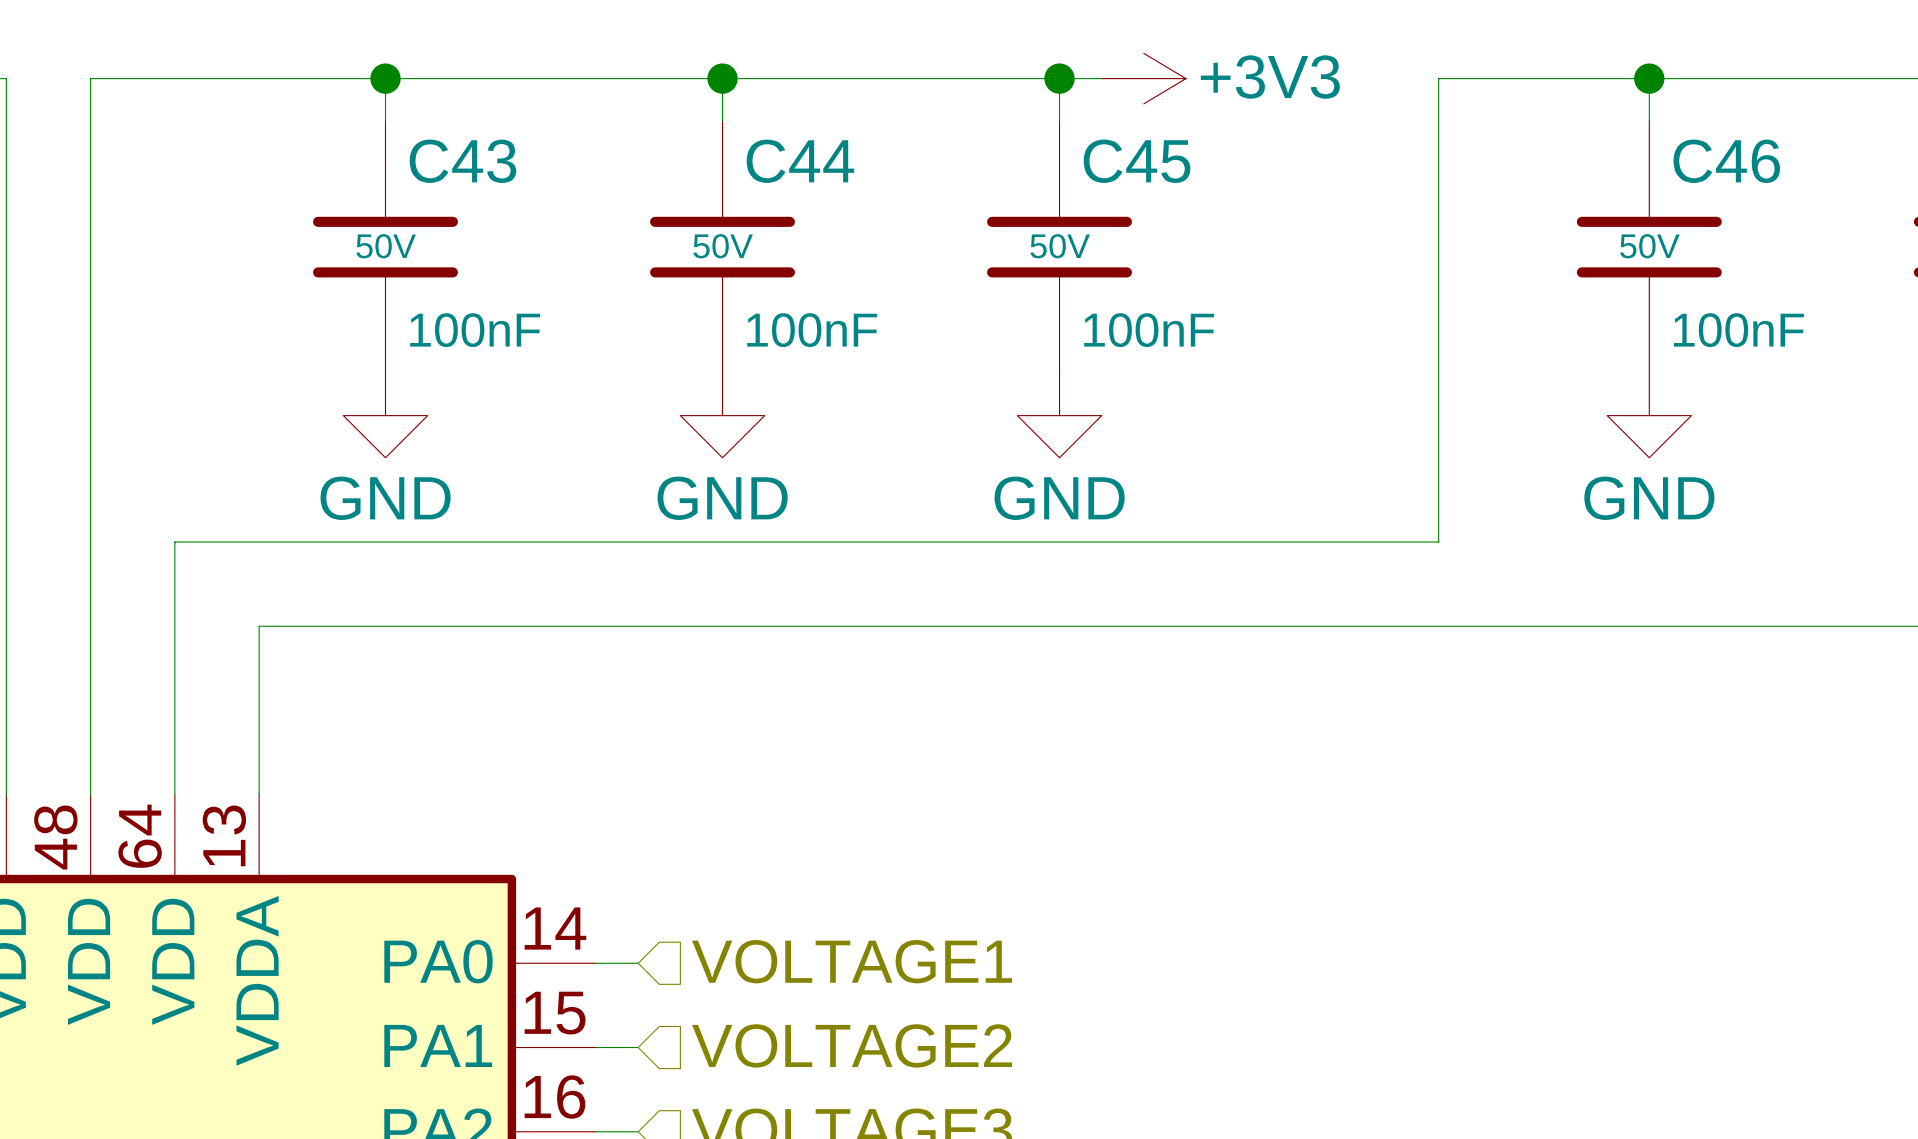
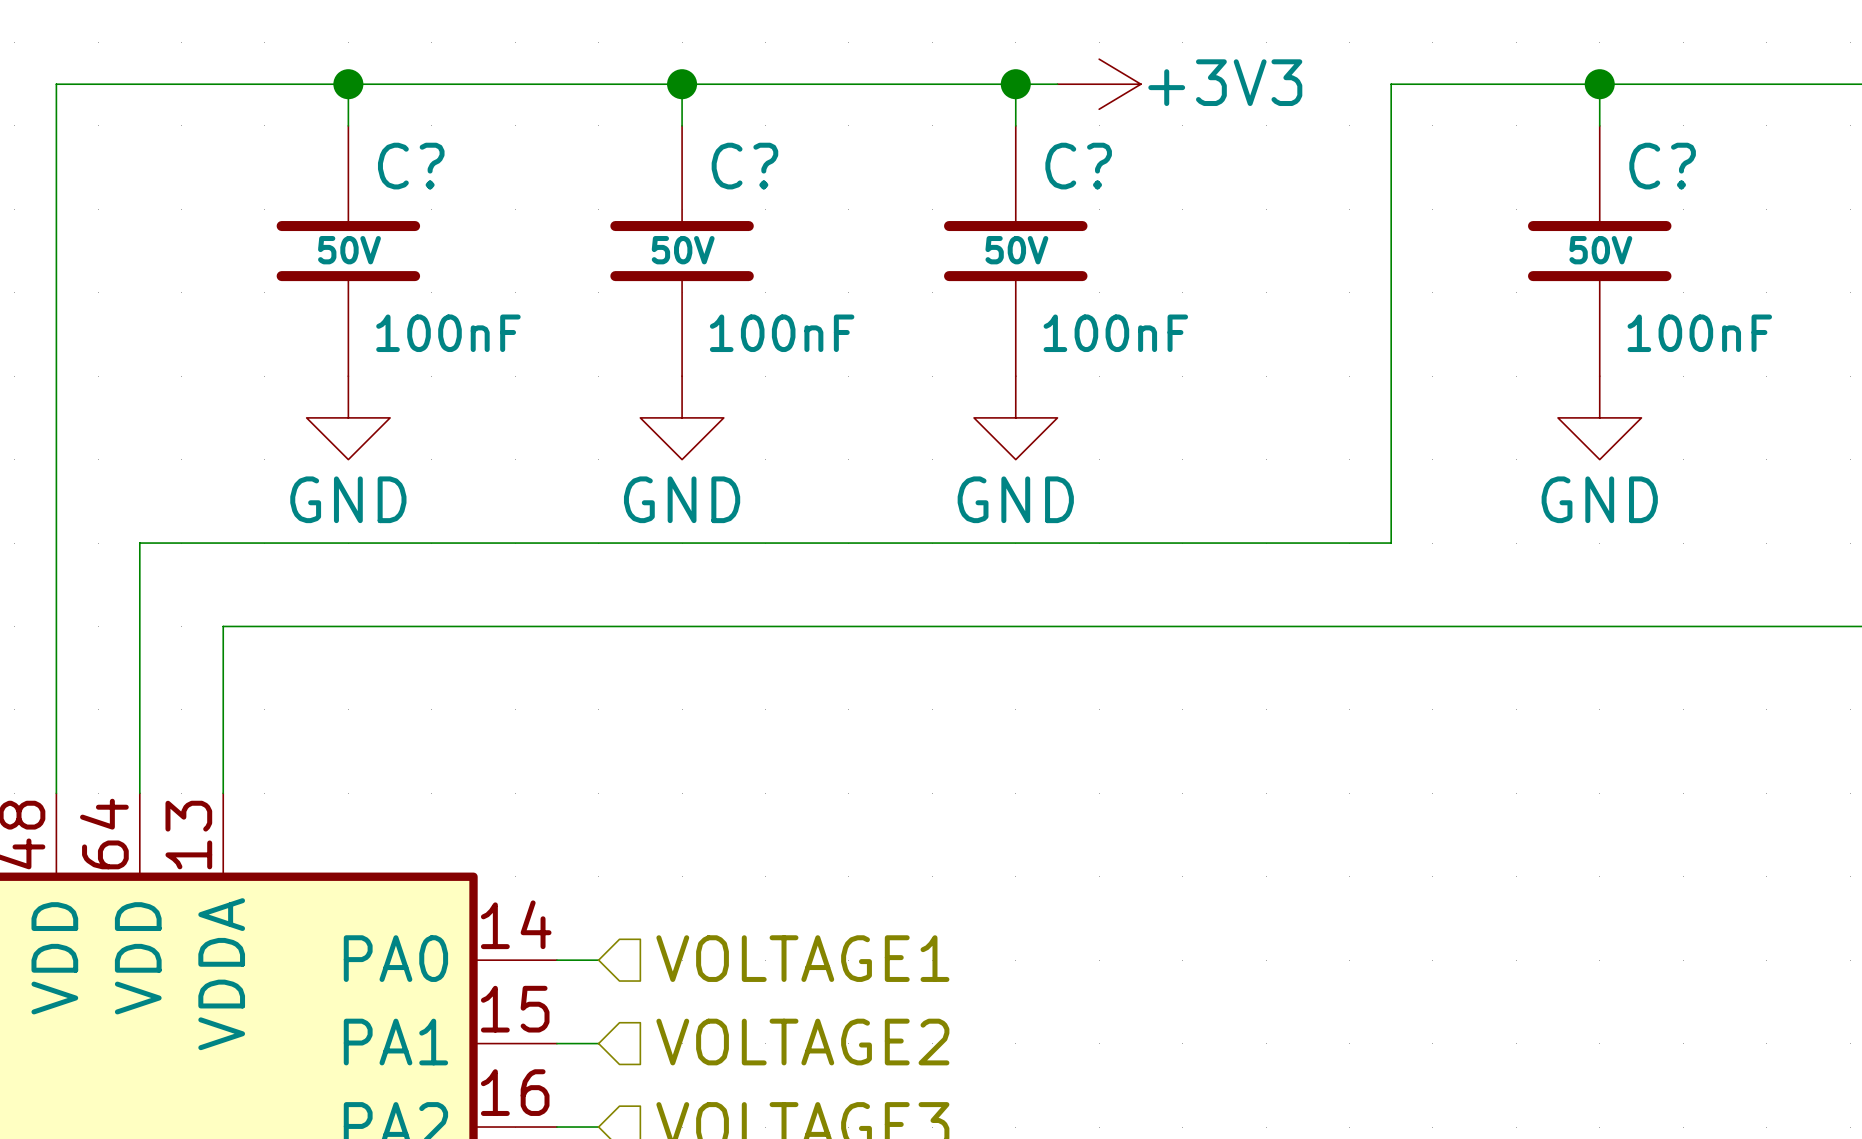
C43 name: C43 (462, 161) -> C? (411, 166)
C44 name: C44 (800, 161) -> C? (744, 166)
C45 name: C45 (1137, 161) -> C? (1078, 166)
C46 name: C46 (1726, 161) -> C? (1662, 166)

